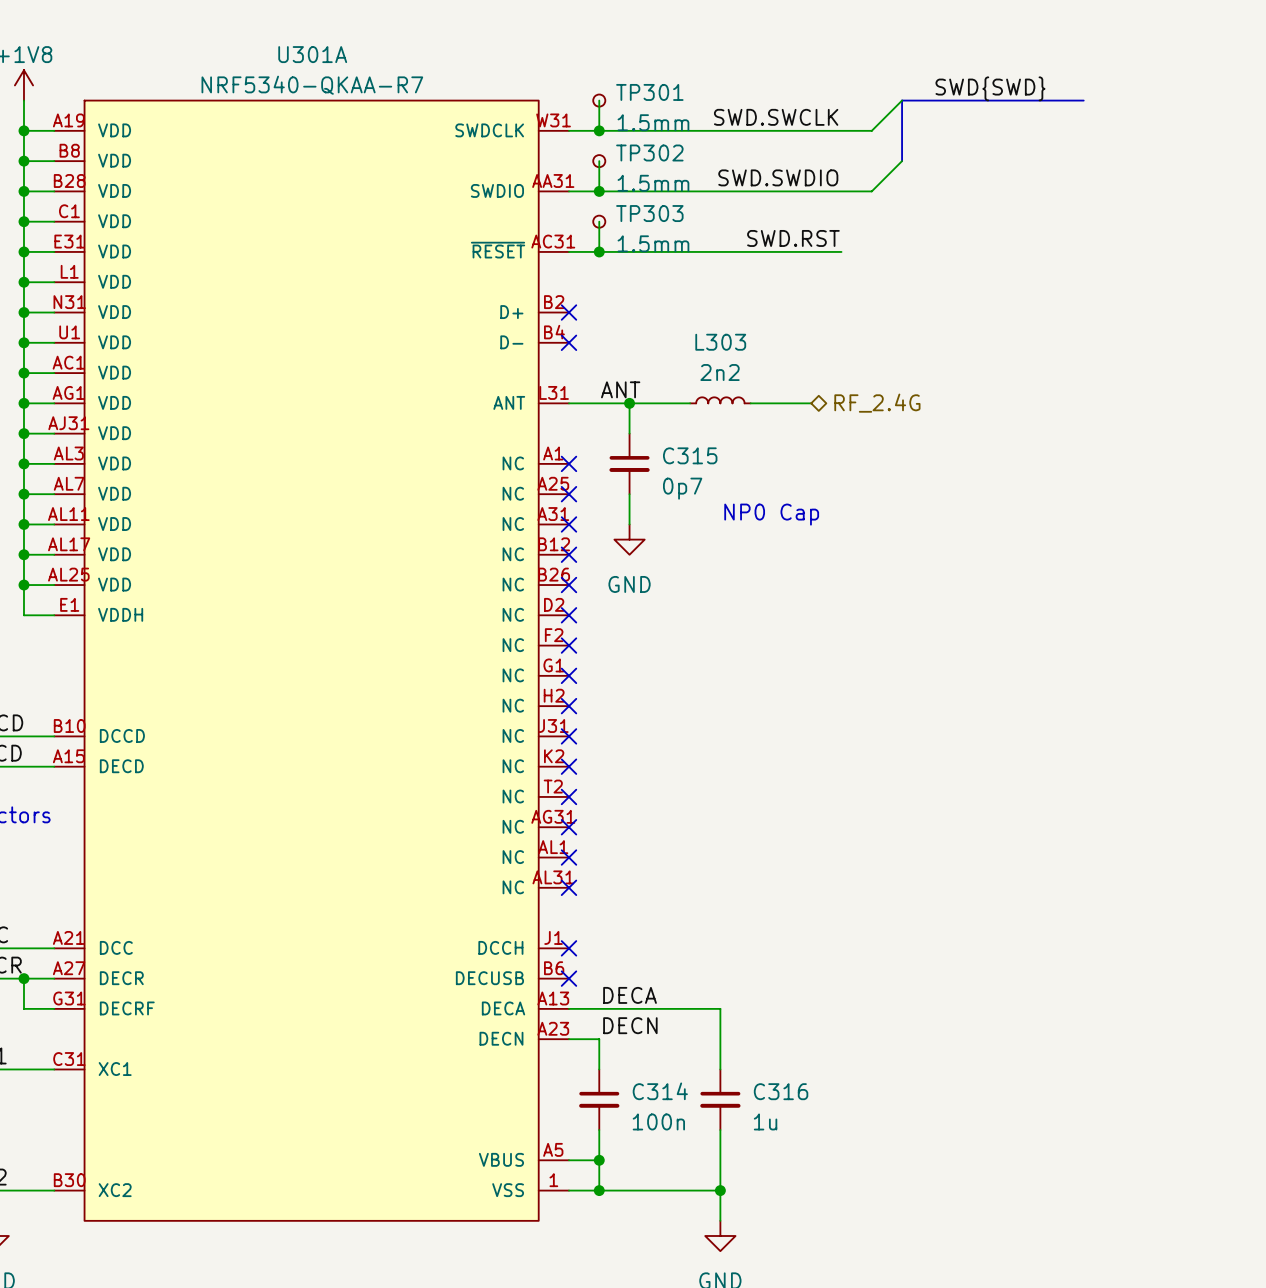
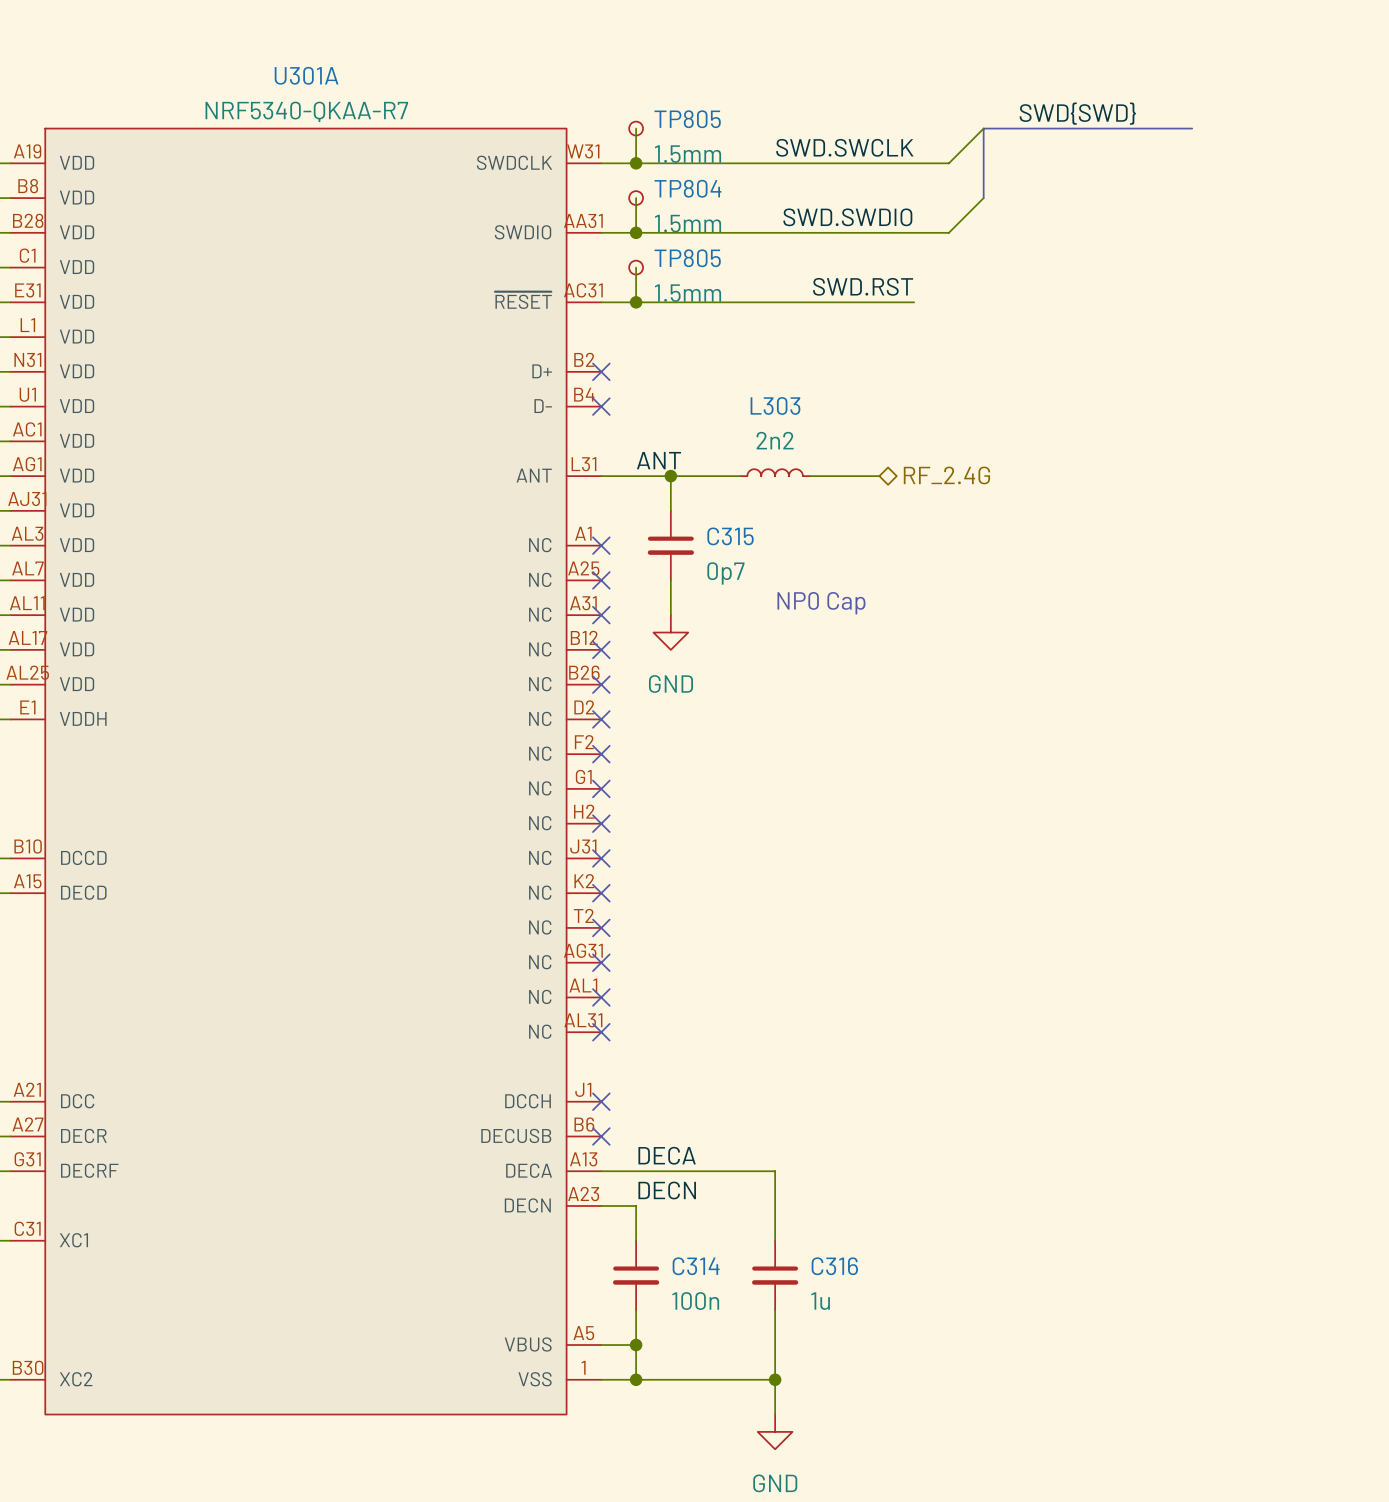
TP301 name: TP301 (649, 92) -> TP805 (687, 119)
TP302 name: TP302 (649, 152) -> TP804 (687, 188)
TP303 name: TP303 (649, 213) -> TP805 (687, 258)

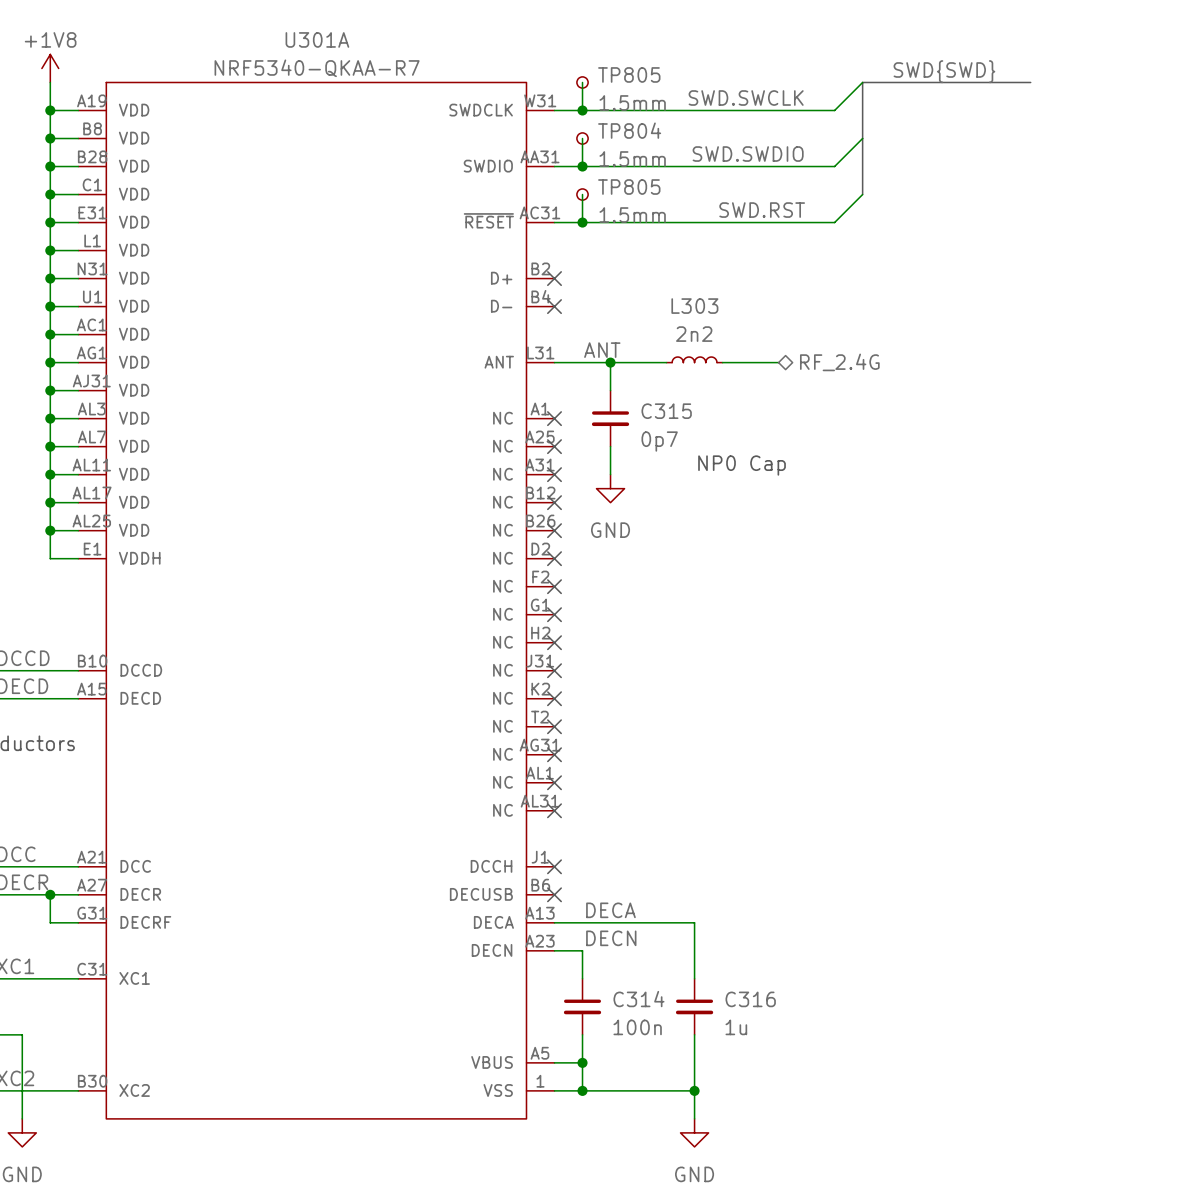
bus: none -> (862, 138) (862, 194)
wire: none -> (862, 194) (834, 222) (806, 222)

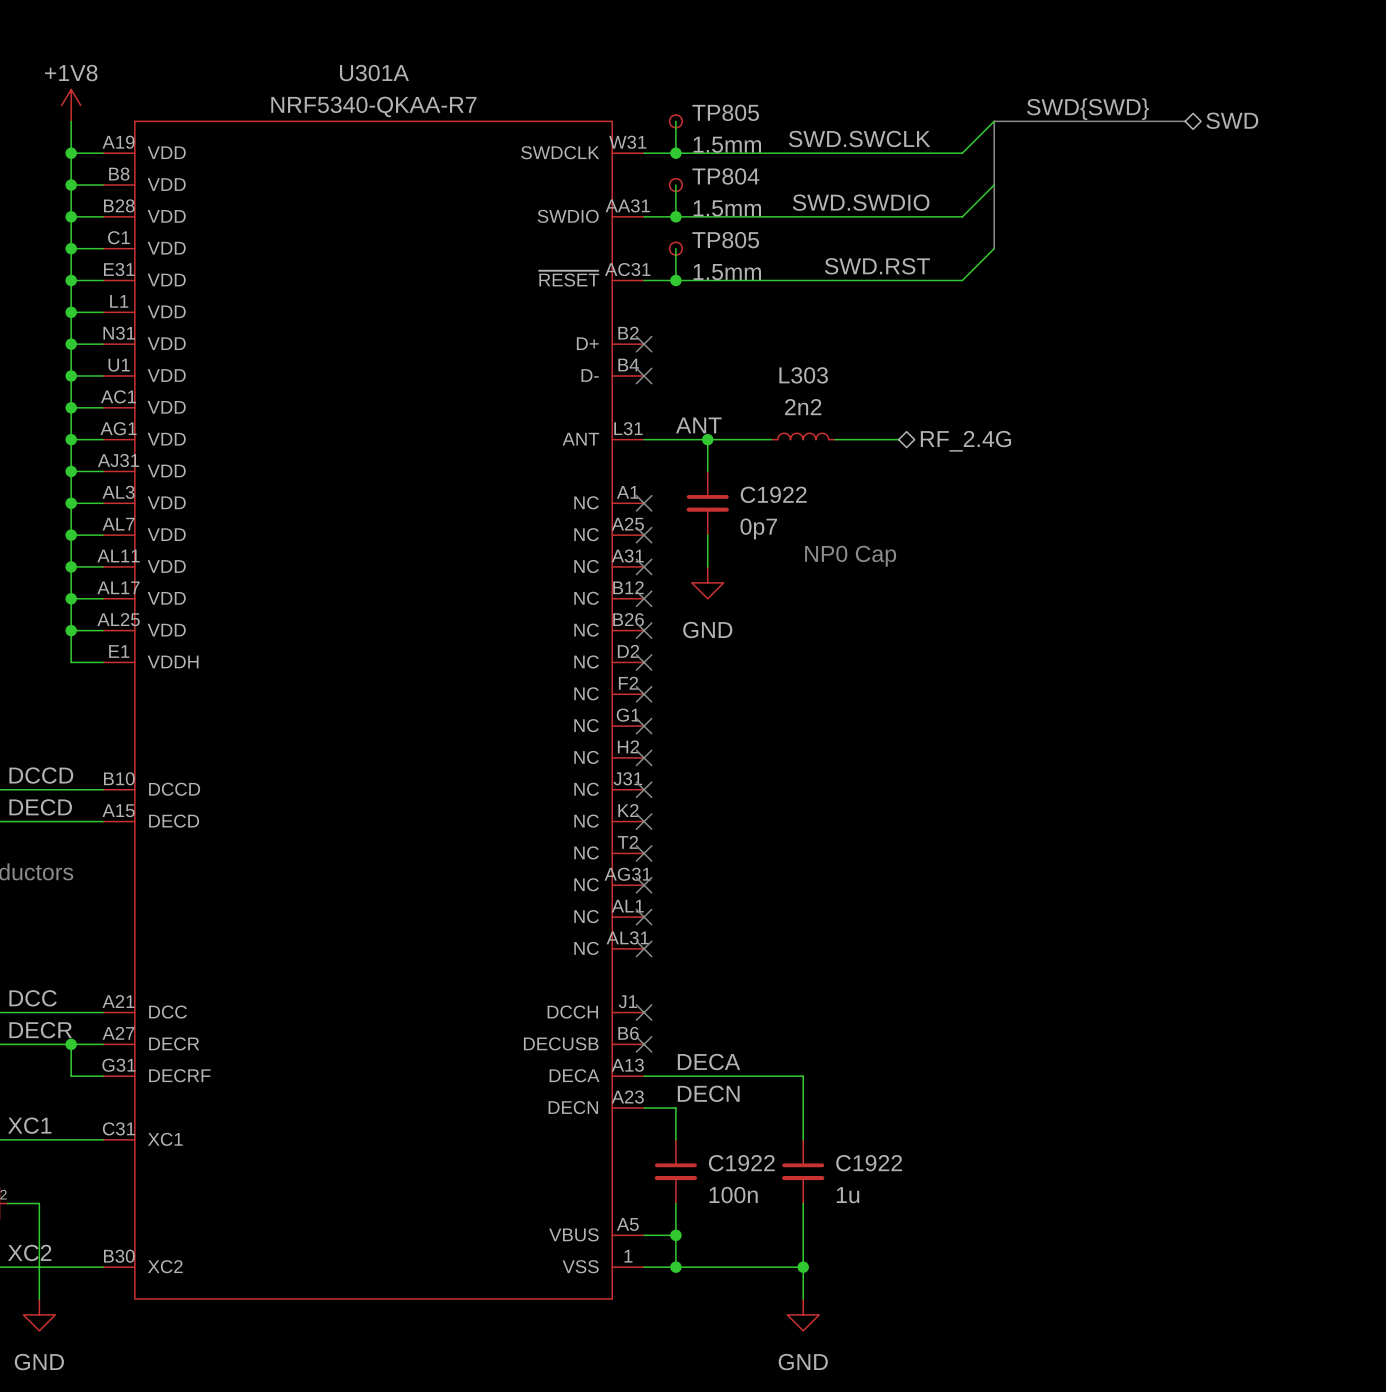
hierarchical label: none -> SWD (1232, 120)
C315 name: C315 (666, 411) -> C1922 (773, 494)
C314 name: C314 (638, 999) -> C1922 (741, 1163)
C316 name: C316 (750, 999) -> C1922 (869, 1163)

